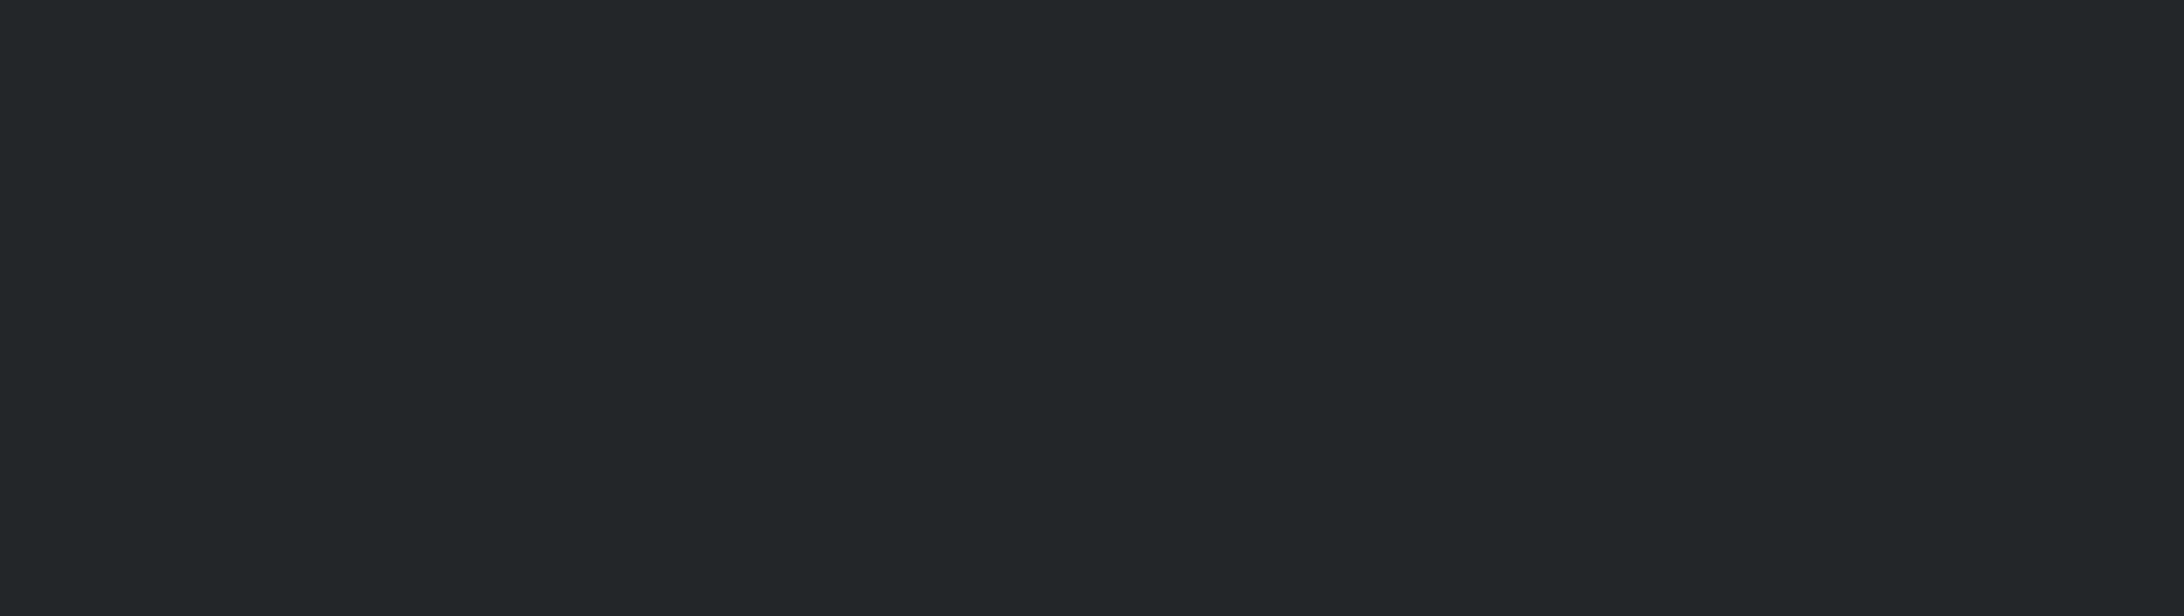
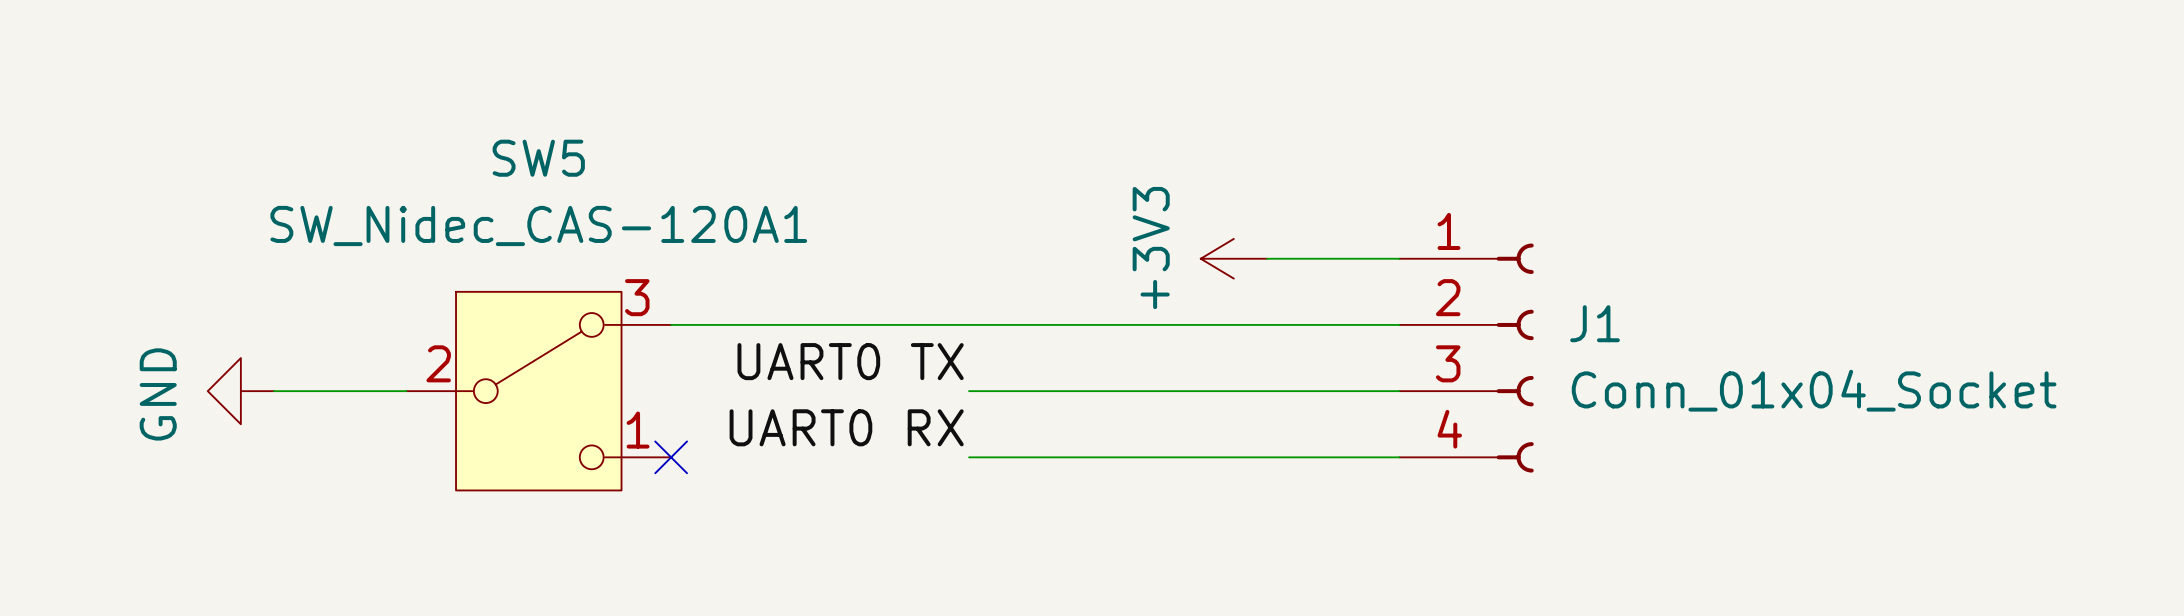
power symbol: none -> +3V3 (1233, 258)
wire: none -> (1266, 258) (1399, 258)
wire: none -> (671, 324) (1399, 324)
J1: none -> Conn_01x04_Socket (1466, 358)
label: none -> UART0 TX (850, 361)
power symbol: none -> GND (240, 391)
wire: none -> (273, 391) (406, 391)
SW5: none -> SW_Nidec_CAS-120A1 (538, 391)
wire: none -> (969, 391) (1399, 391)
label: none -> UART0 RX (846, 427)
no-connect mark: none -> (671, 457)
wire: none -> (969, 457) (1399, 457)

